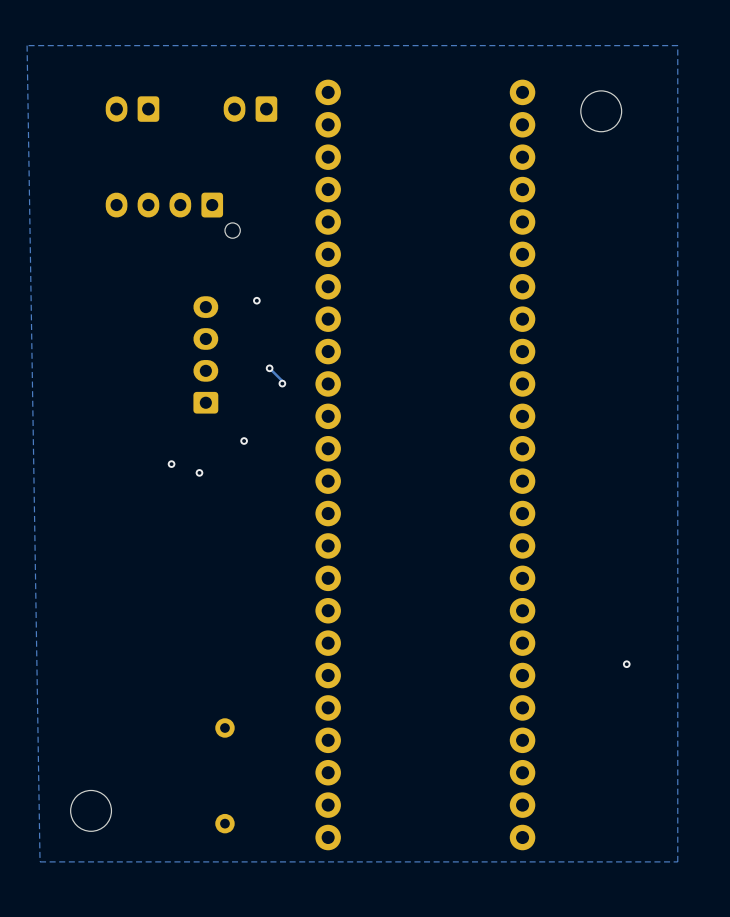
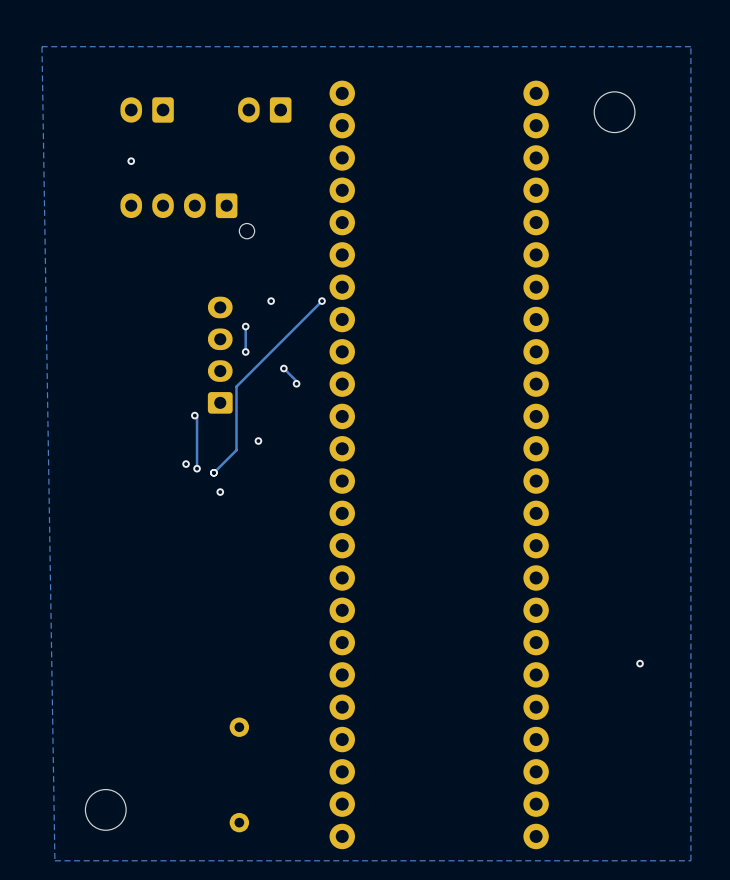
via: none -> (131, 161)
track: none -> (322, 301) (236, 386) (236, 450) (213, 472)
via: none -> (322, 301)
track: none -> (245, 326) (245, 351)
via: none -> (245, 326)
via: none -> (245, 351)
track: none -> (194, 415) (197, 417) (197, 468)
via: none -> (194, 415)
via: none -> (197, 468)
via: none -> (220, 492)

